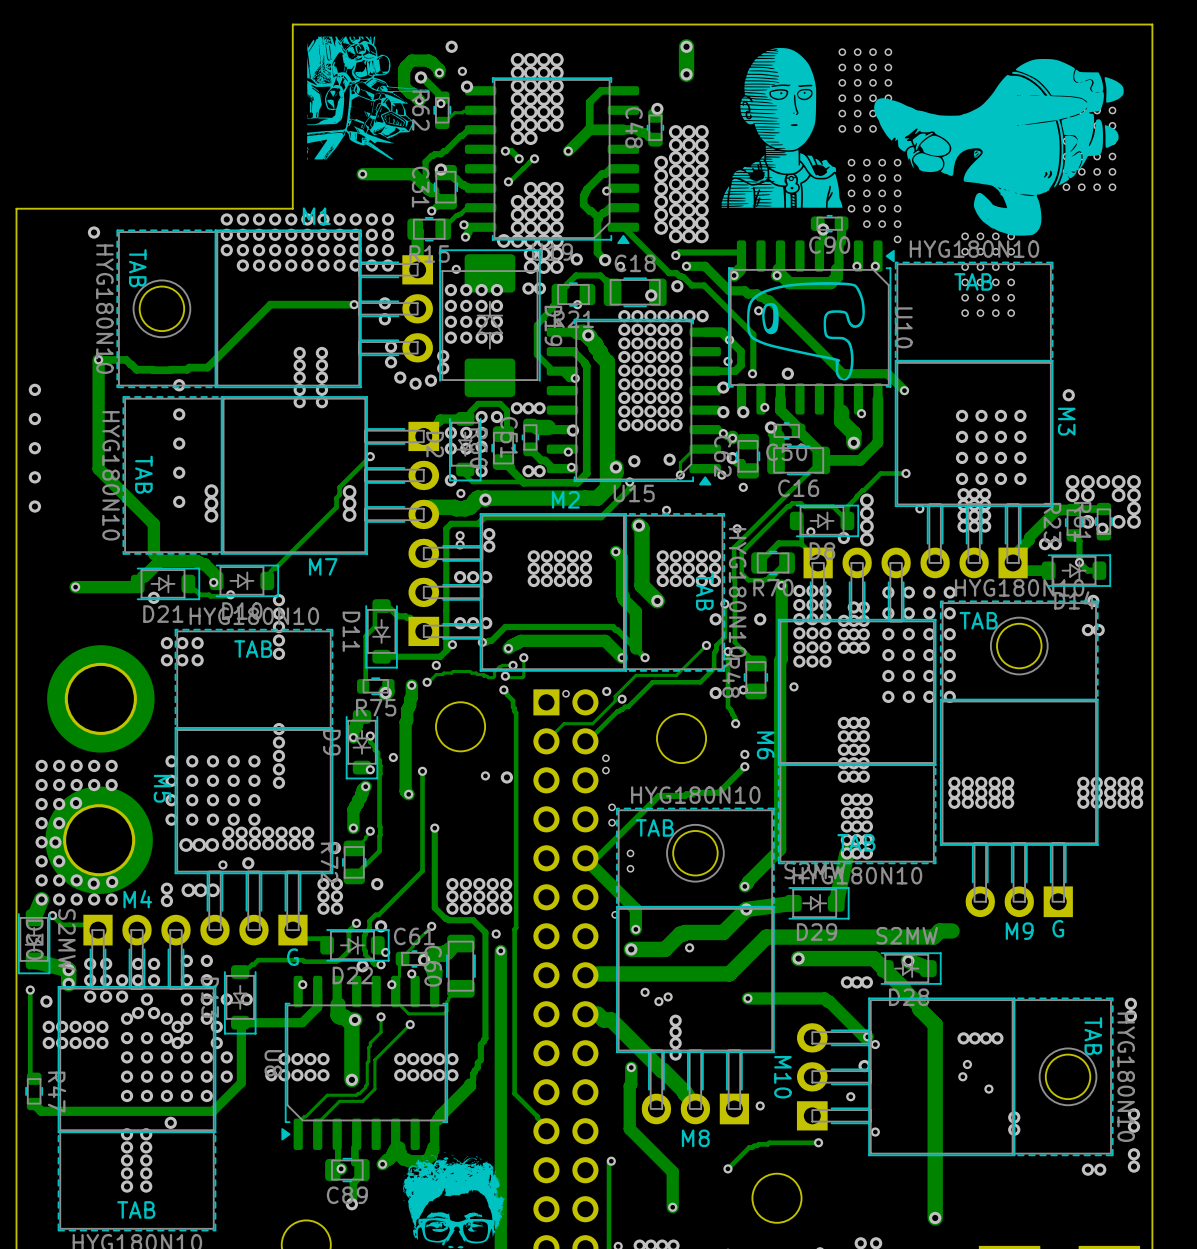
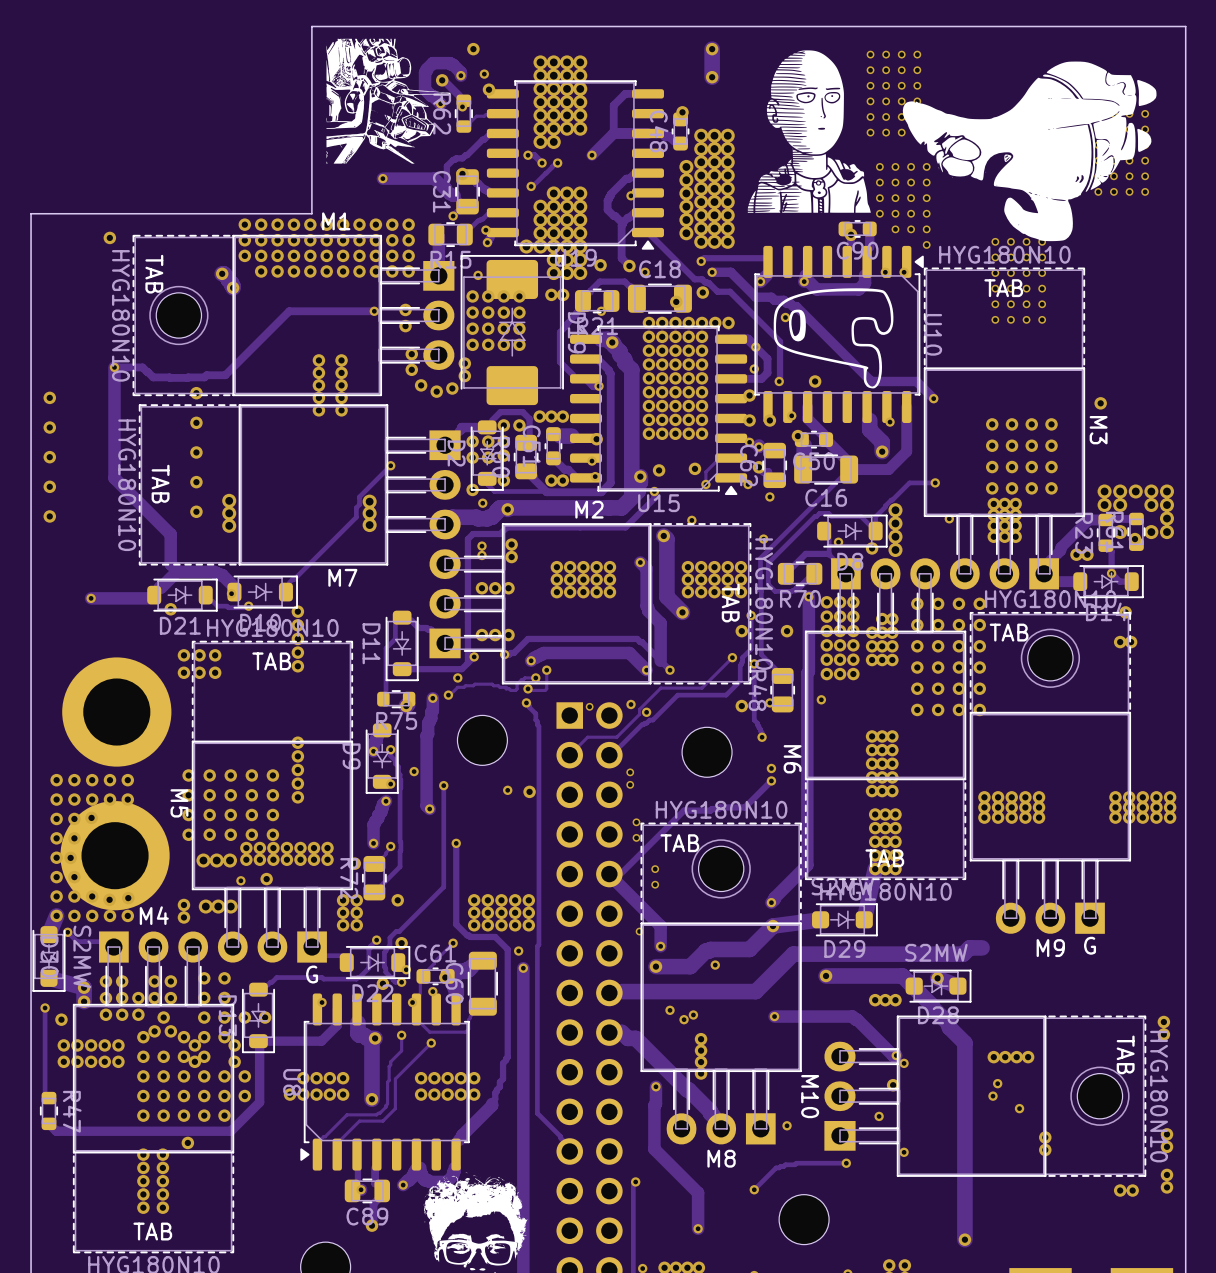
track: none -> (222, 273) (228, 278) (233, 287)
via: none -> (222, 273)
via: none -> (233, 287)

